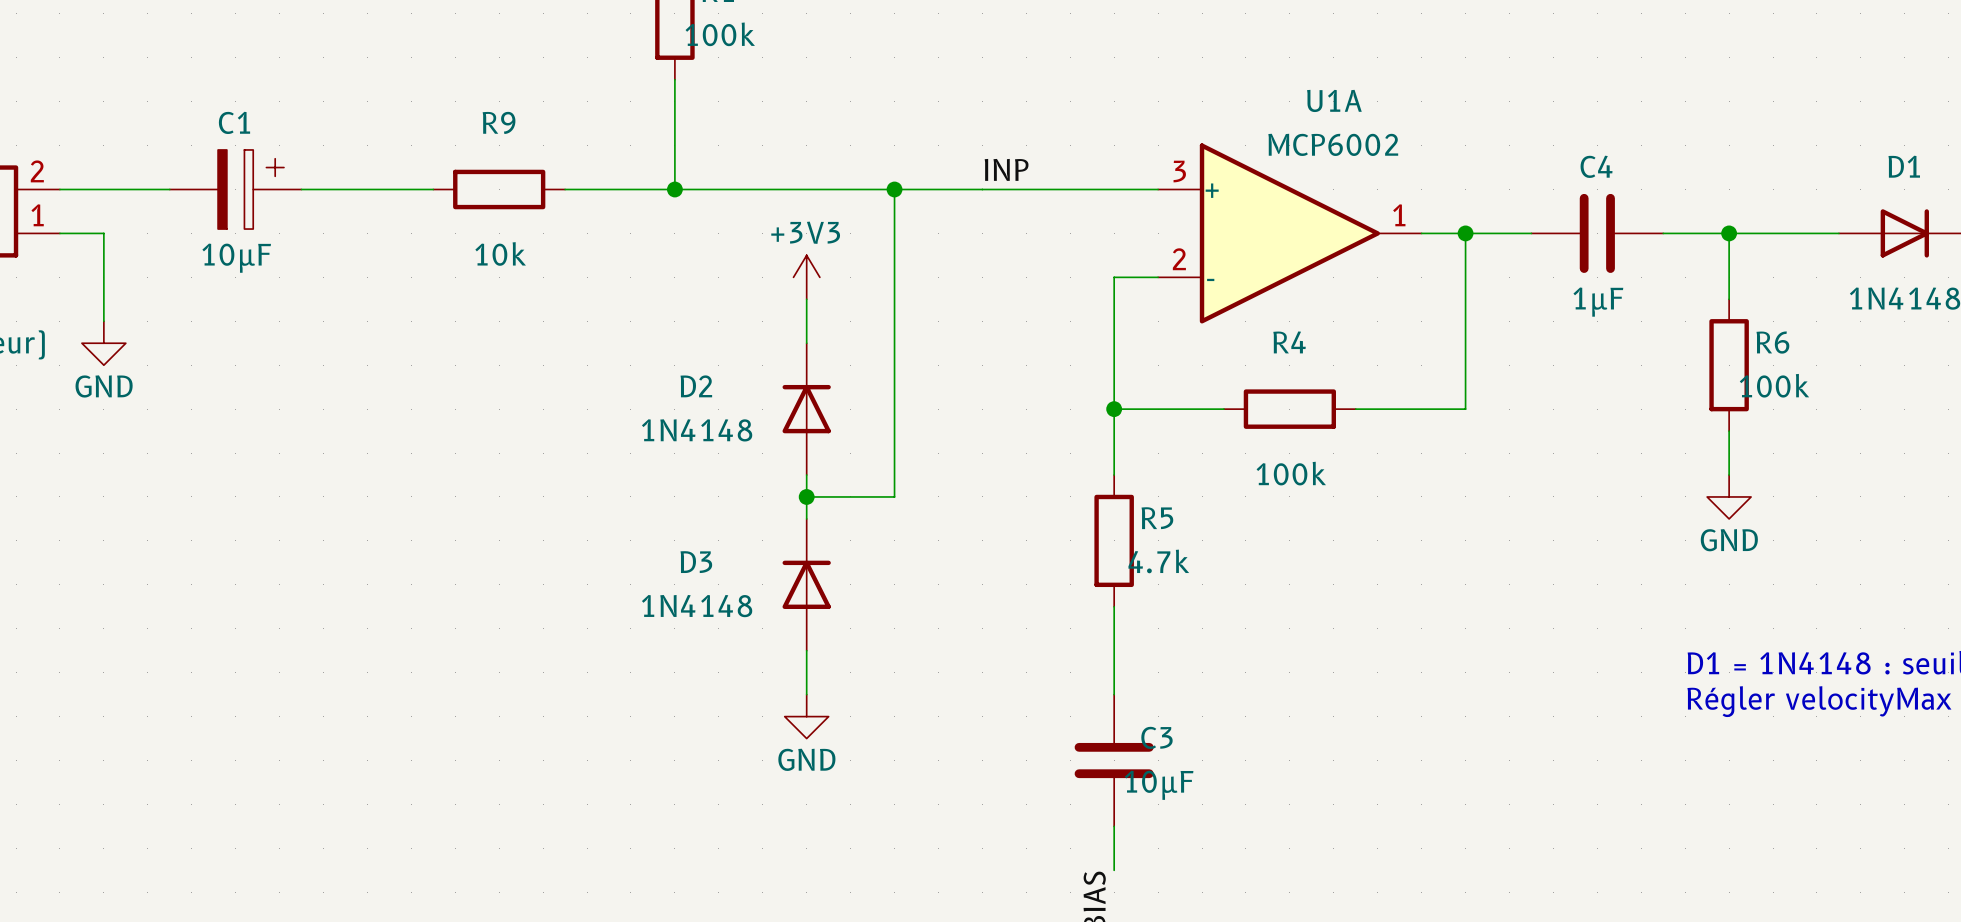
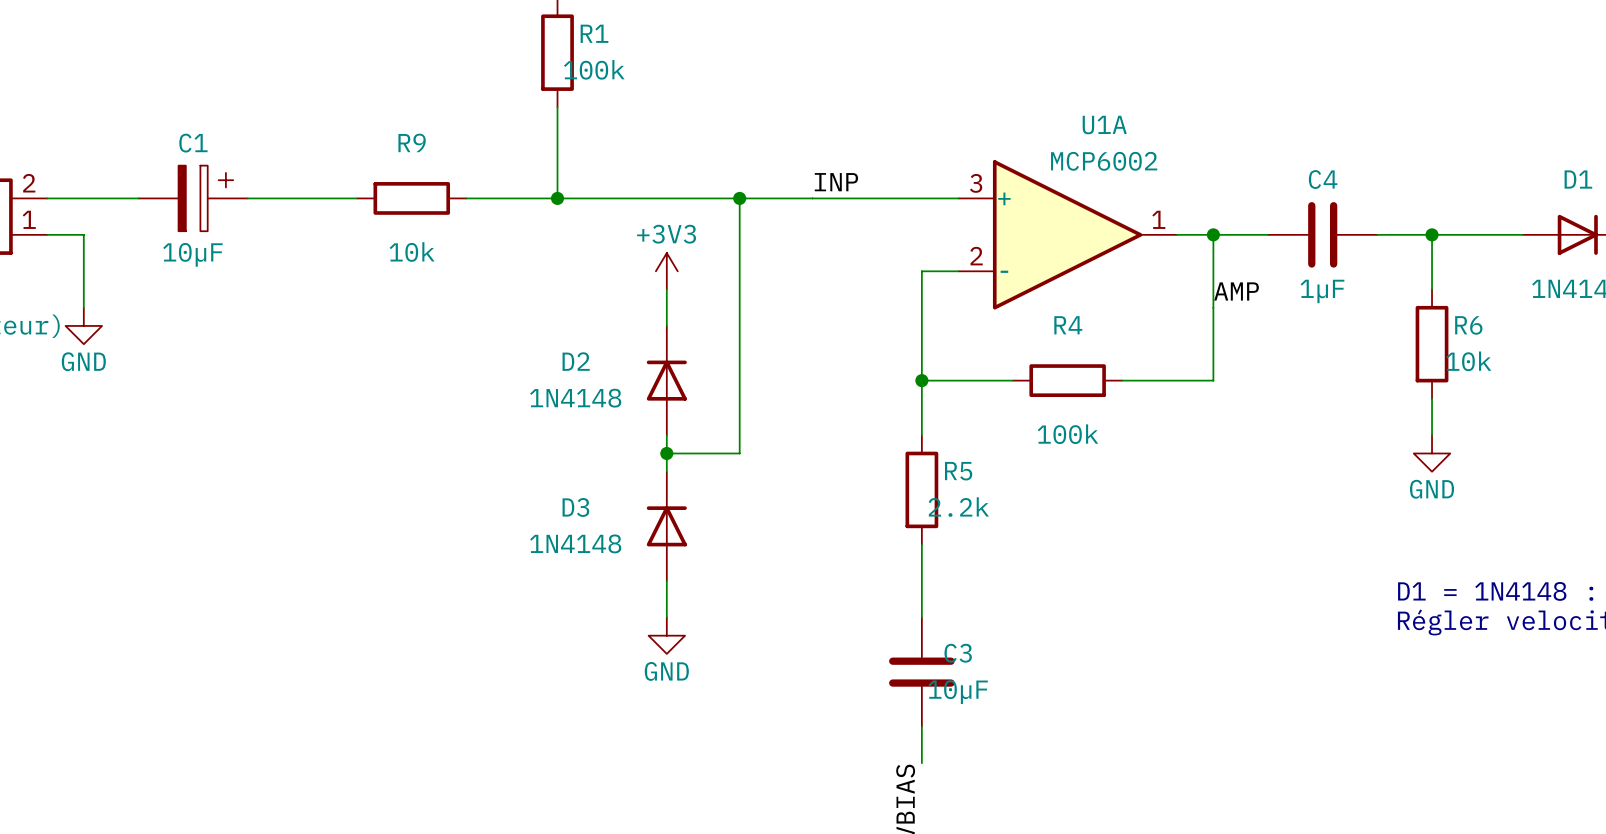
label: none -> AMP (1236, 291)
R6 value: 100k (1774, 385) -> 10k (1468, 361)
R5 value: 4.7k (1158, 561) -> 2.2k (958, 507)

